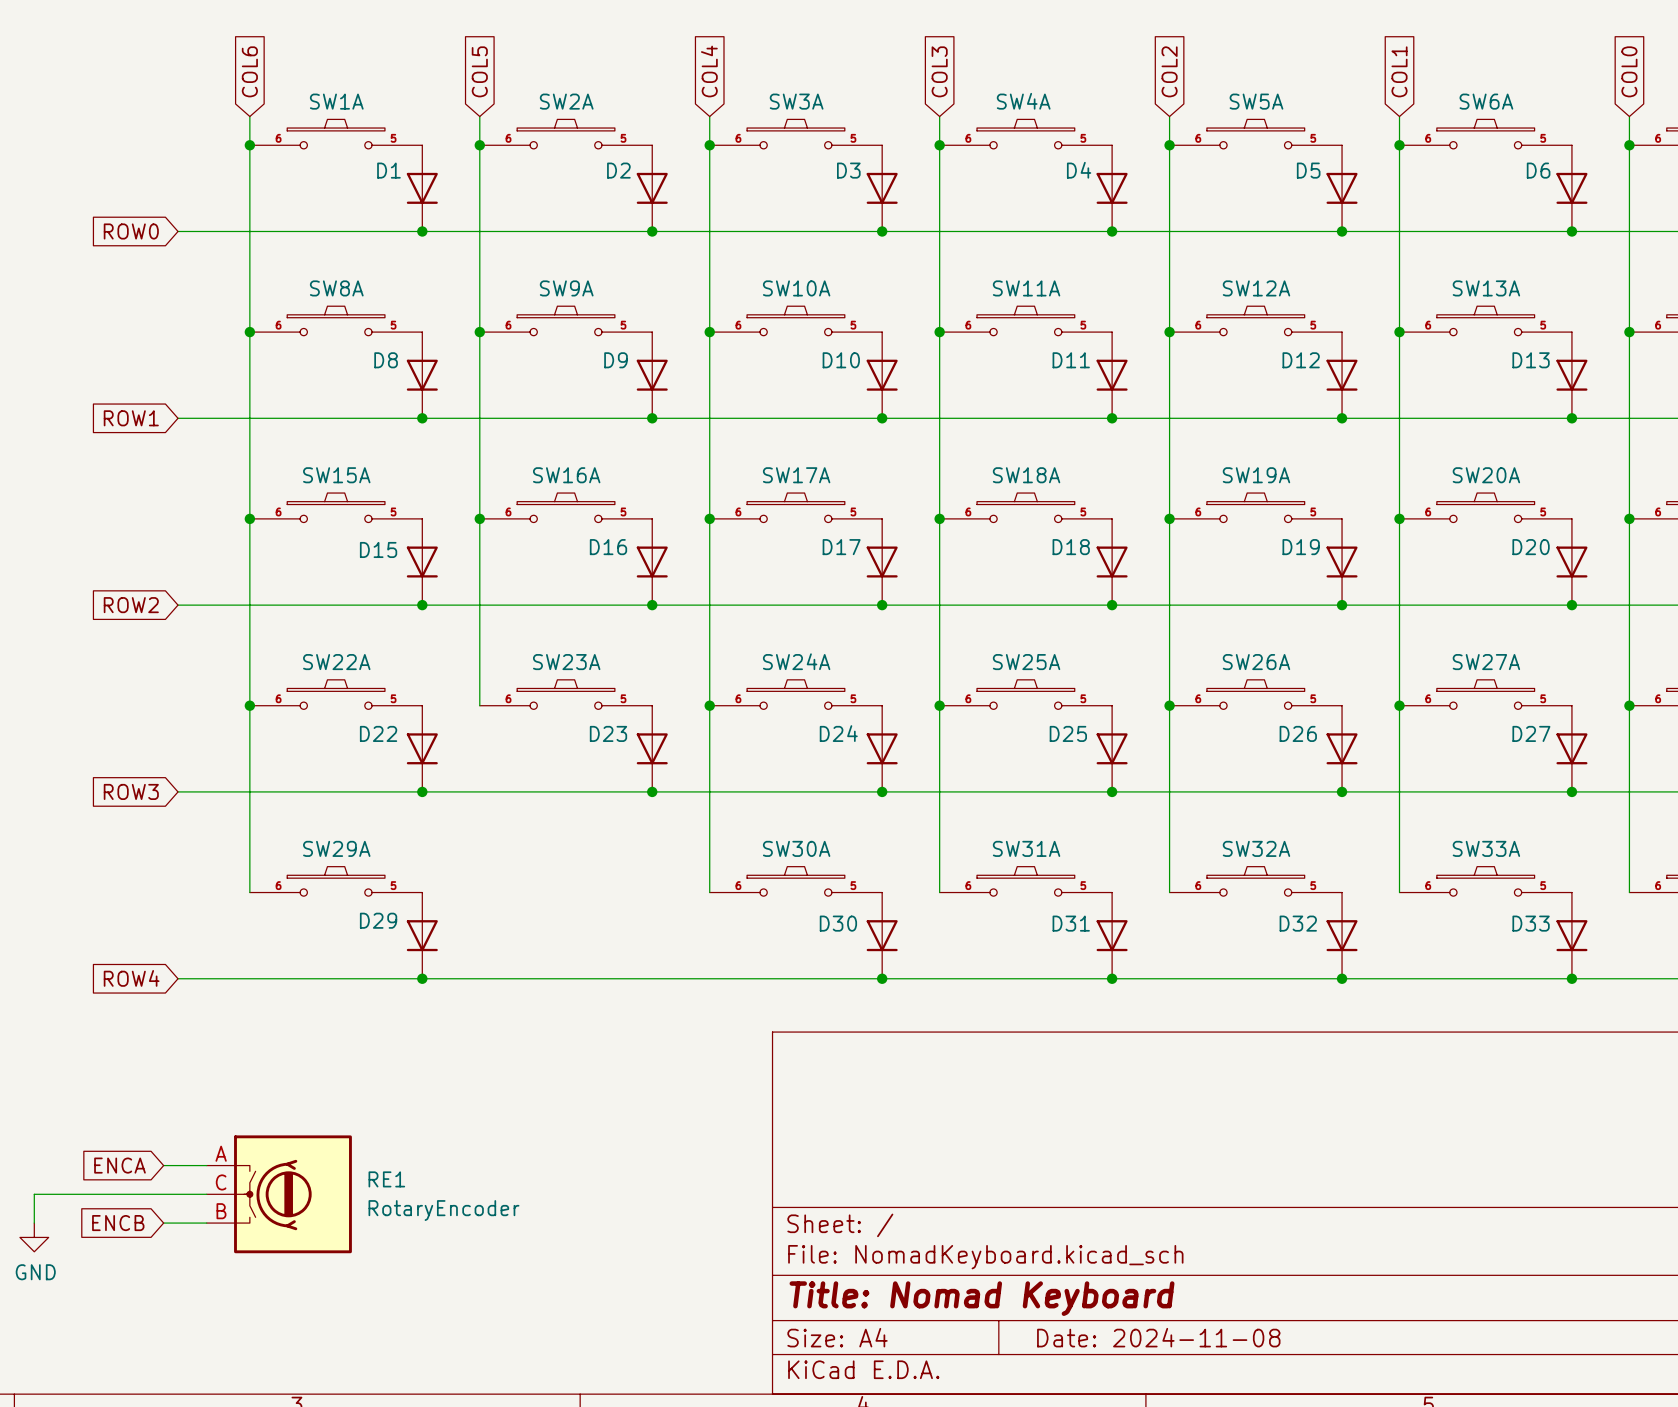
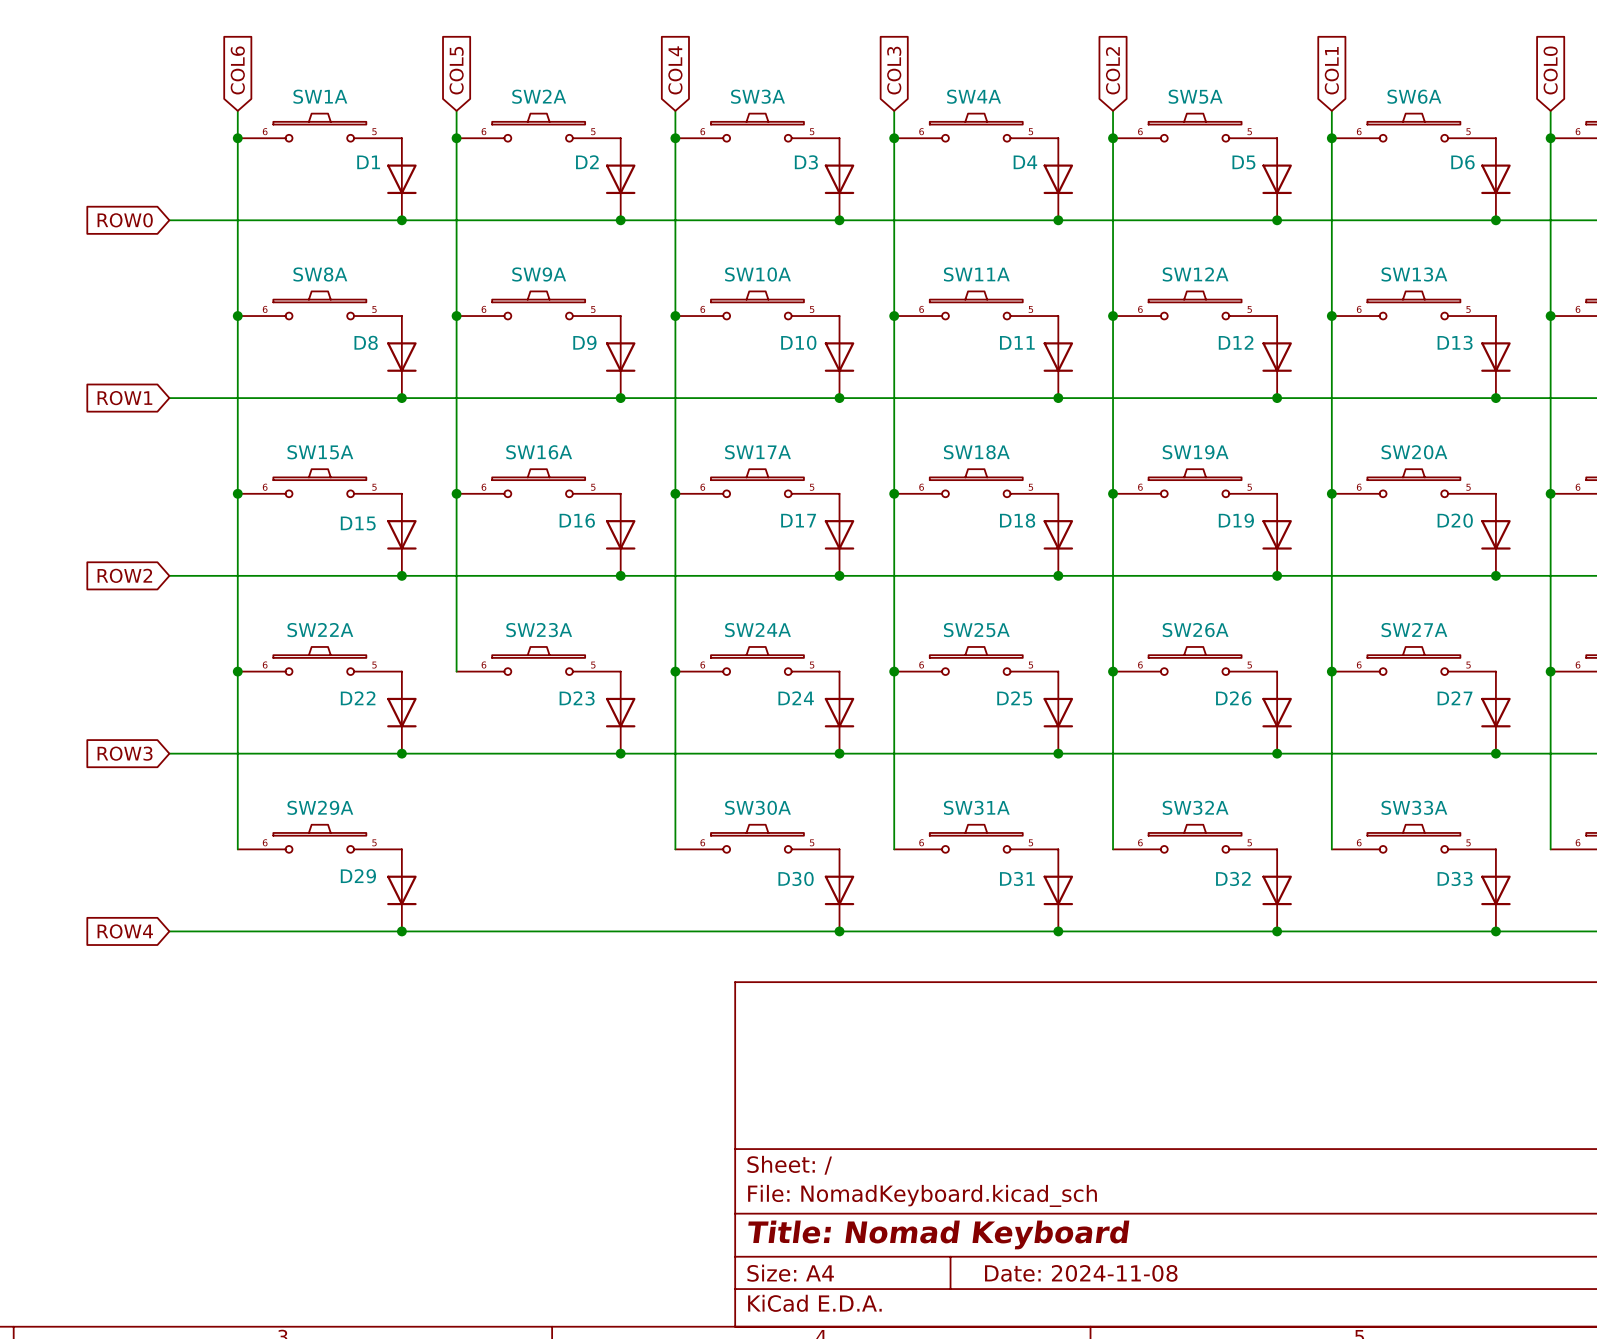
global label: ENCA (119, 1165) -> none
wire: (163, 1165) (206, 1165) -> none
wire: (206, 1194) (34, 1194) (34, 1223) -> none
RE1: RotaryEncoder (279, 1194) -> none
global label: ENCB (118, 1223) -> none
wire: (163, 1223) (206, 1223) -> none
power symbol: GND (34, 1237) -> none

